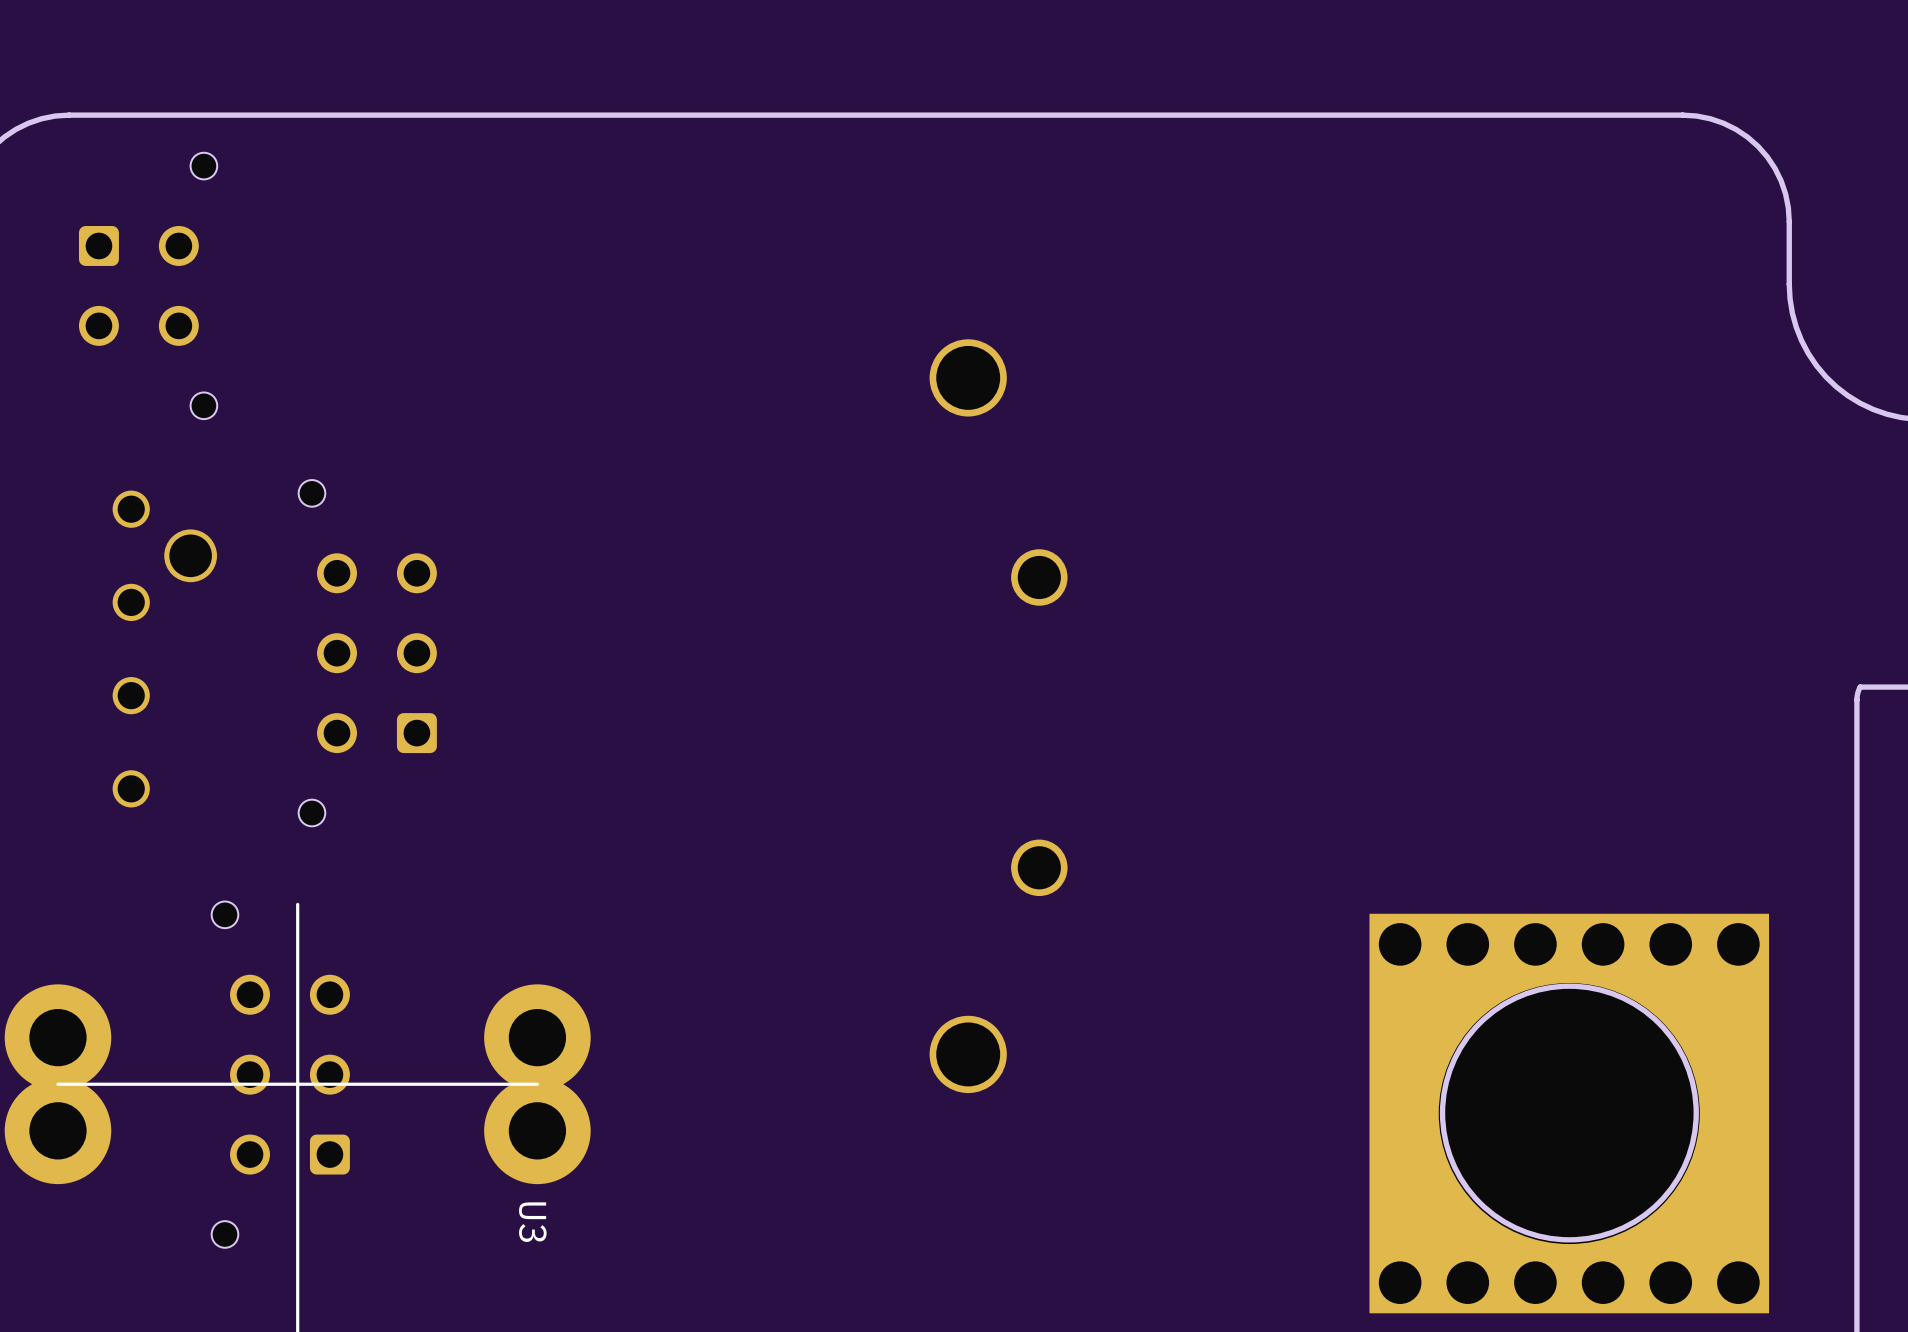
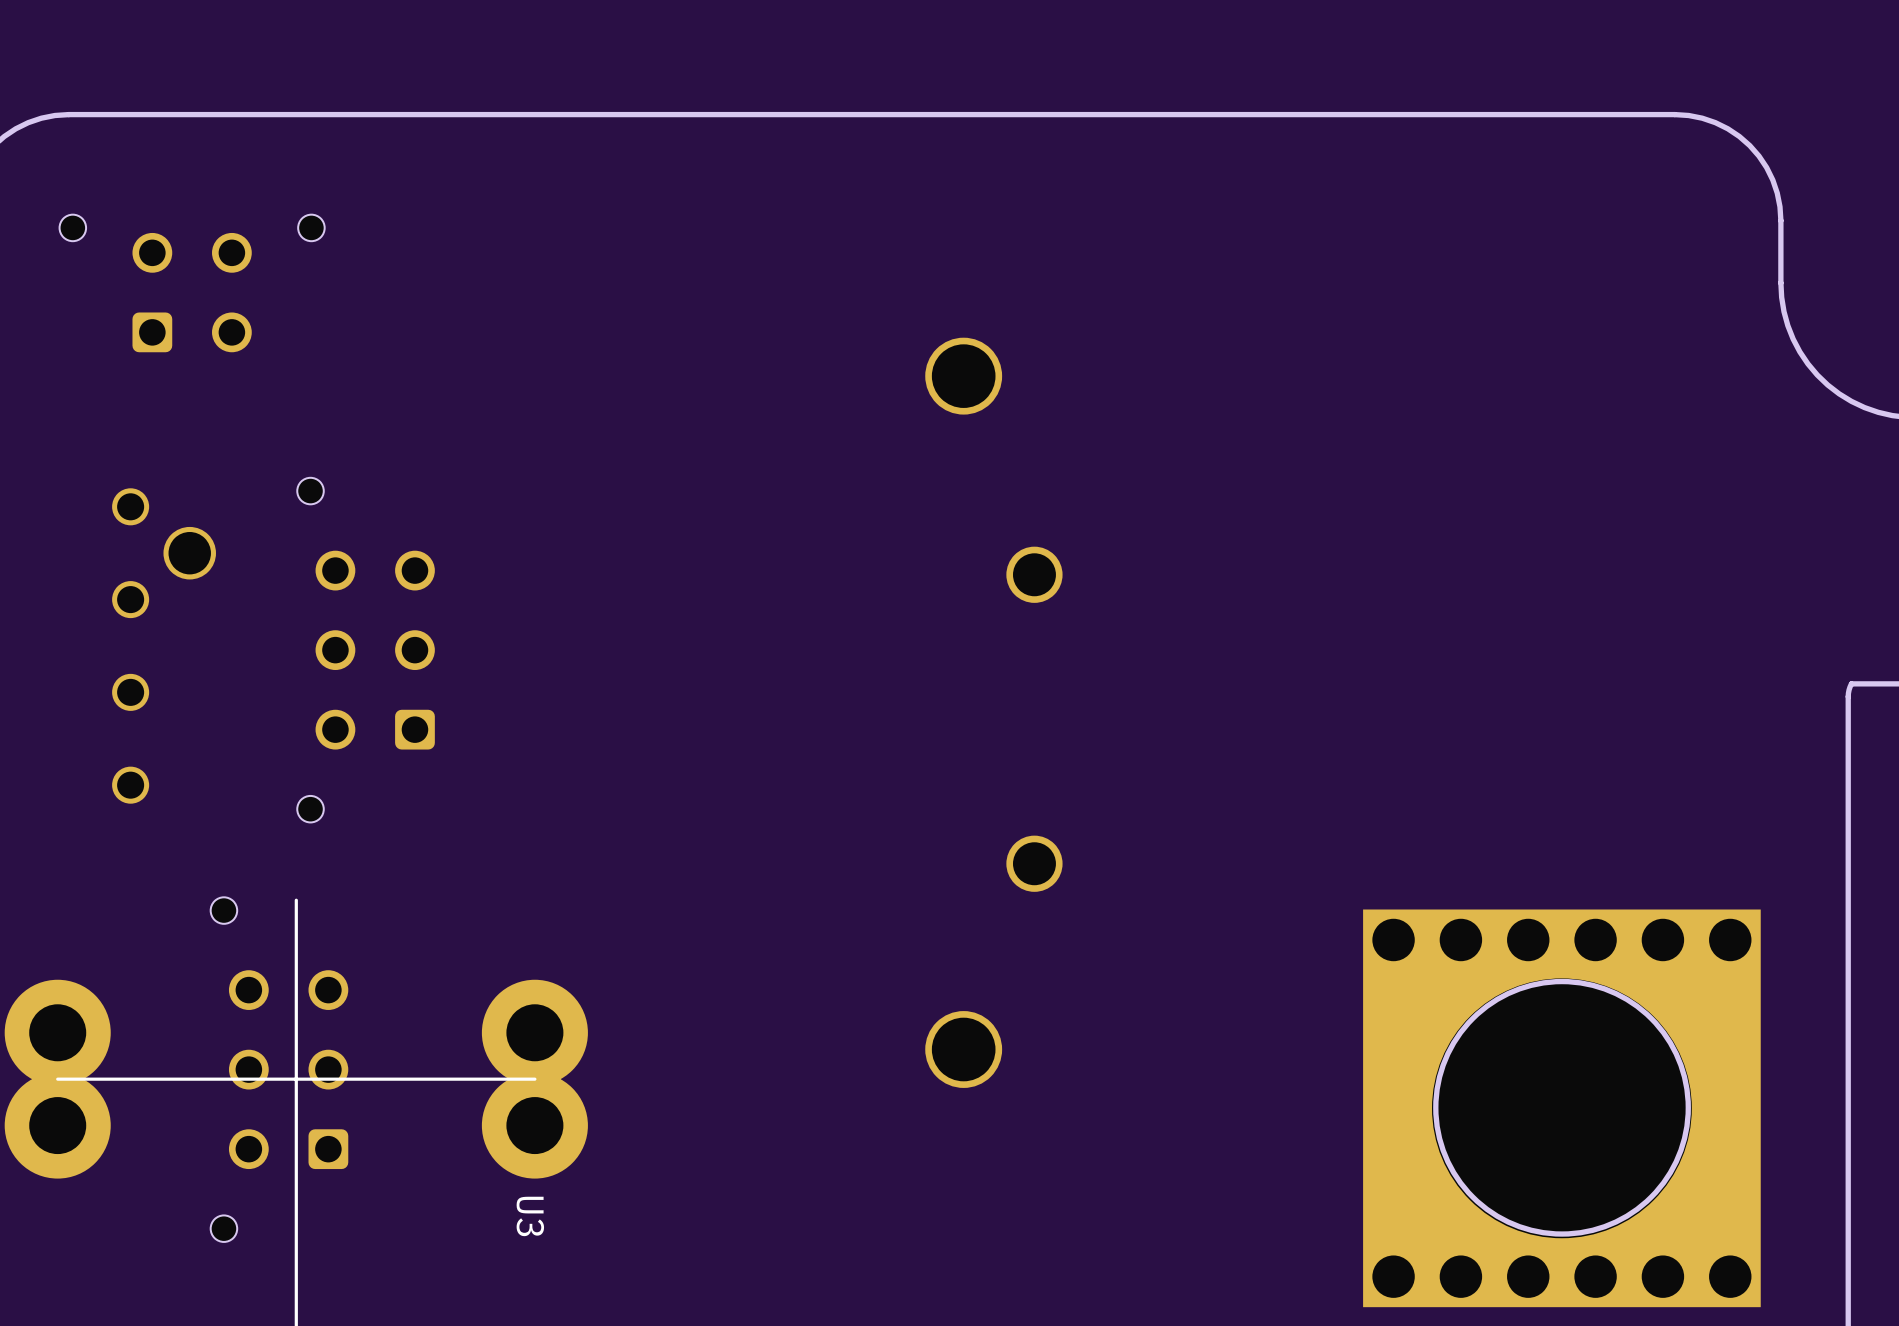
part rotation: 0° (148, 285) -> 90° counterclockwise (192, 283)

